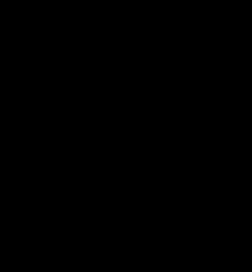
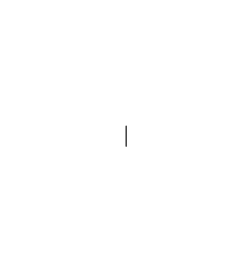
line: none -> (126, 126) (126, 146)

